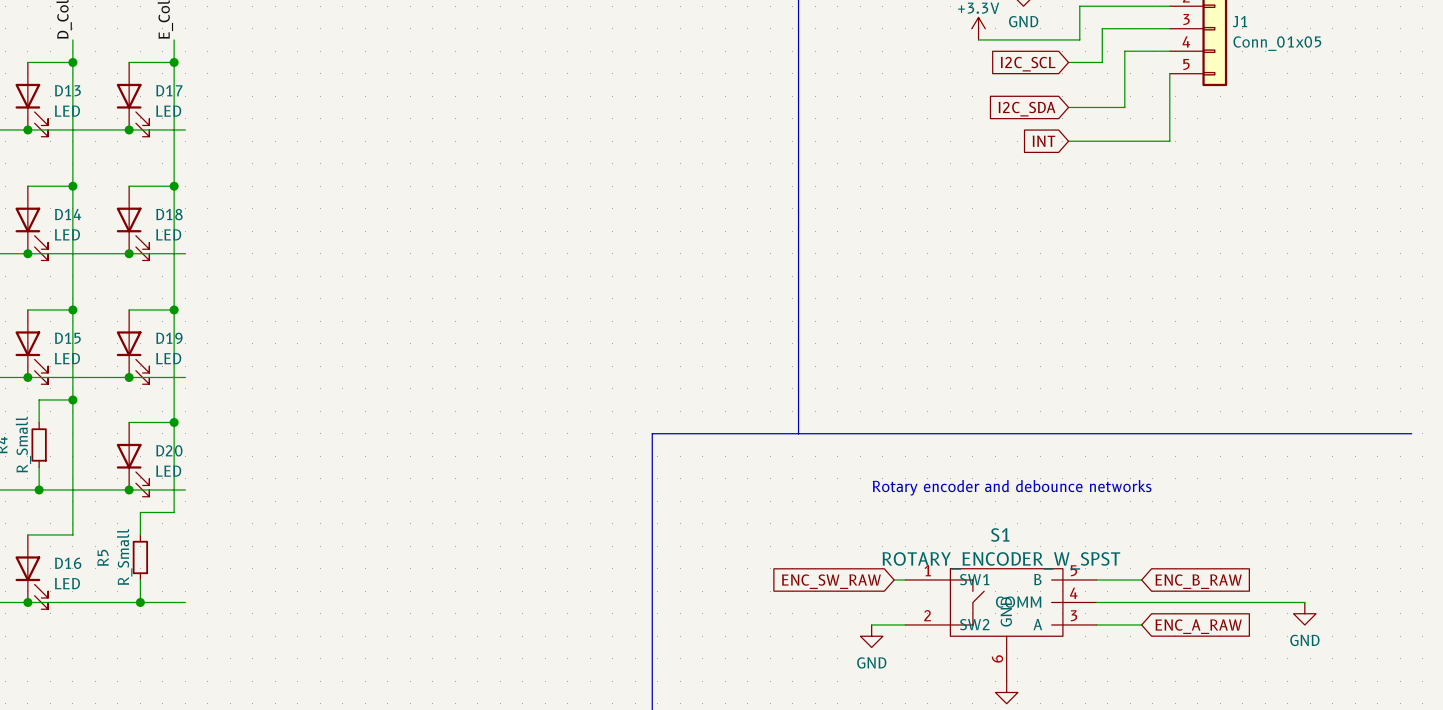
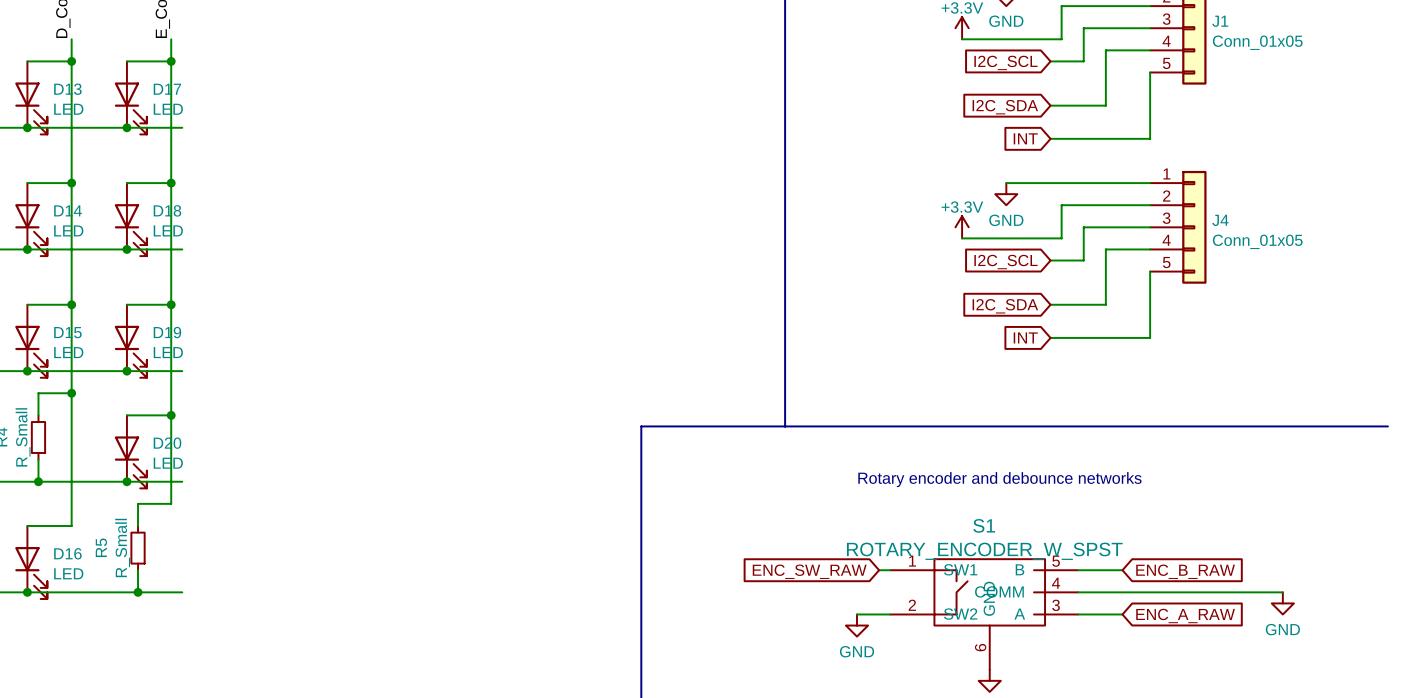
wire: none -> (1006, 183) (1150, 183)
power symbol: none -> GND (1006, 194)
wire: none -> (1150, 205) (1061, 205) (1061, 238) (962, 238)
power symbol: none -> +3.3V (962, 227)
wire: none -> (1150, 227) (1083, 227) (1083, 260) (1050, 260)
J4: none -> Conn_01x05 (1178, 227)
wire: none -> (1150, 249) (1105, 249) (1105, 304) (1050, 304)
global label: none -> I2C_SCL (1005, 262)
wire: none -> (1150, 271) (1150, 337) (1050, 337)
global label: none -> I2C_SDA (1005, 306)
global label: none -> INT (1025, 337)

